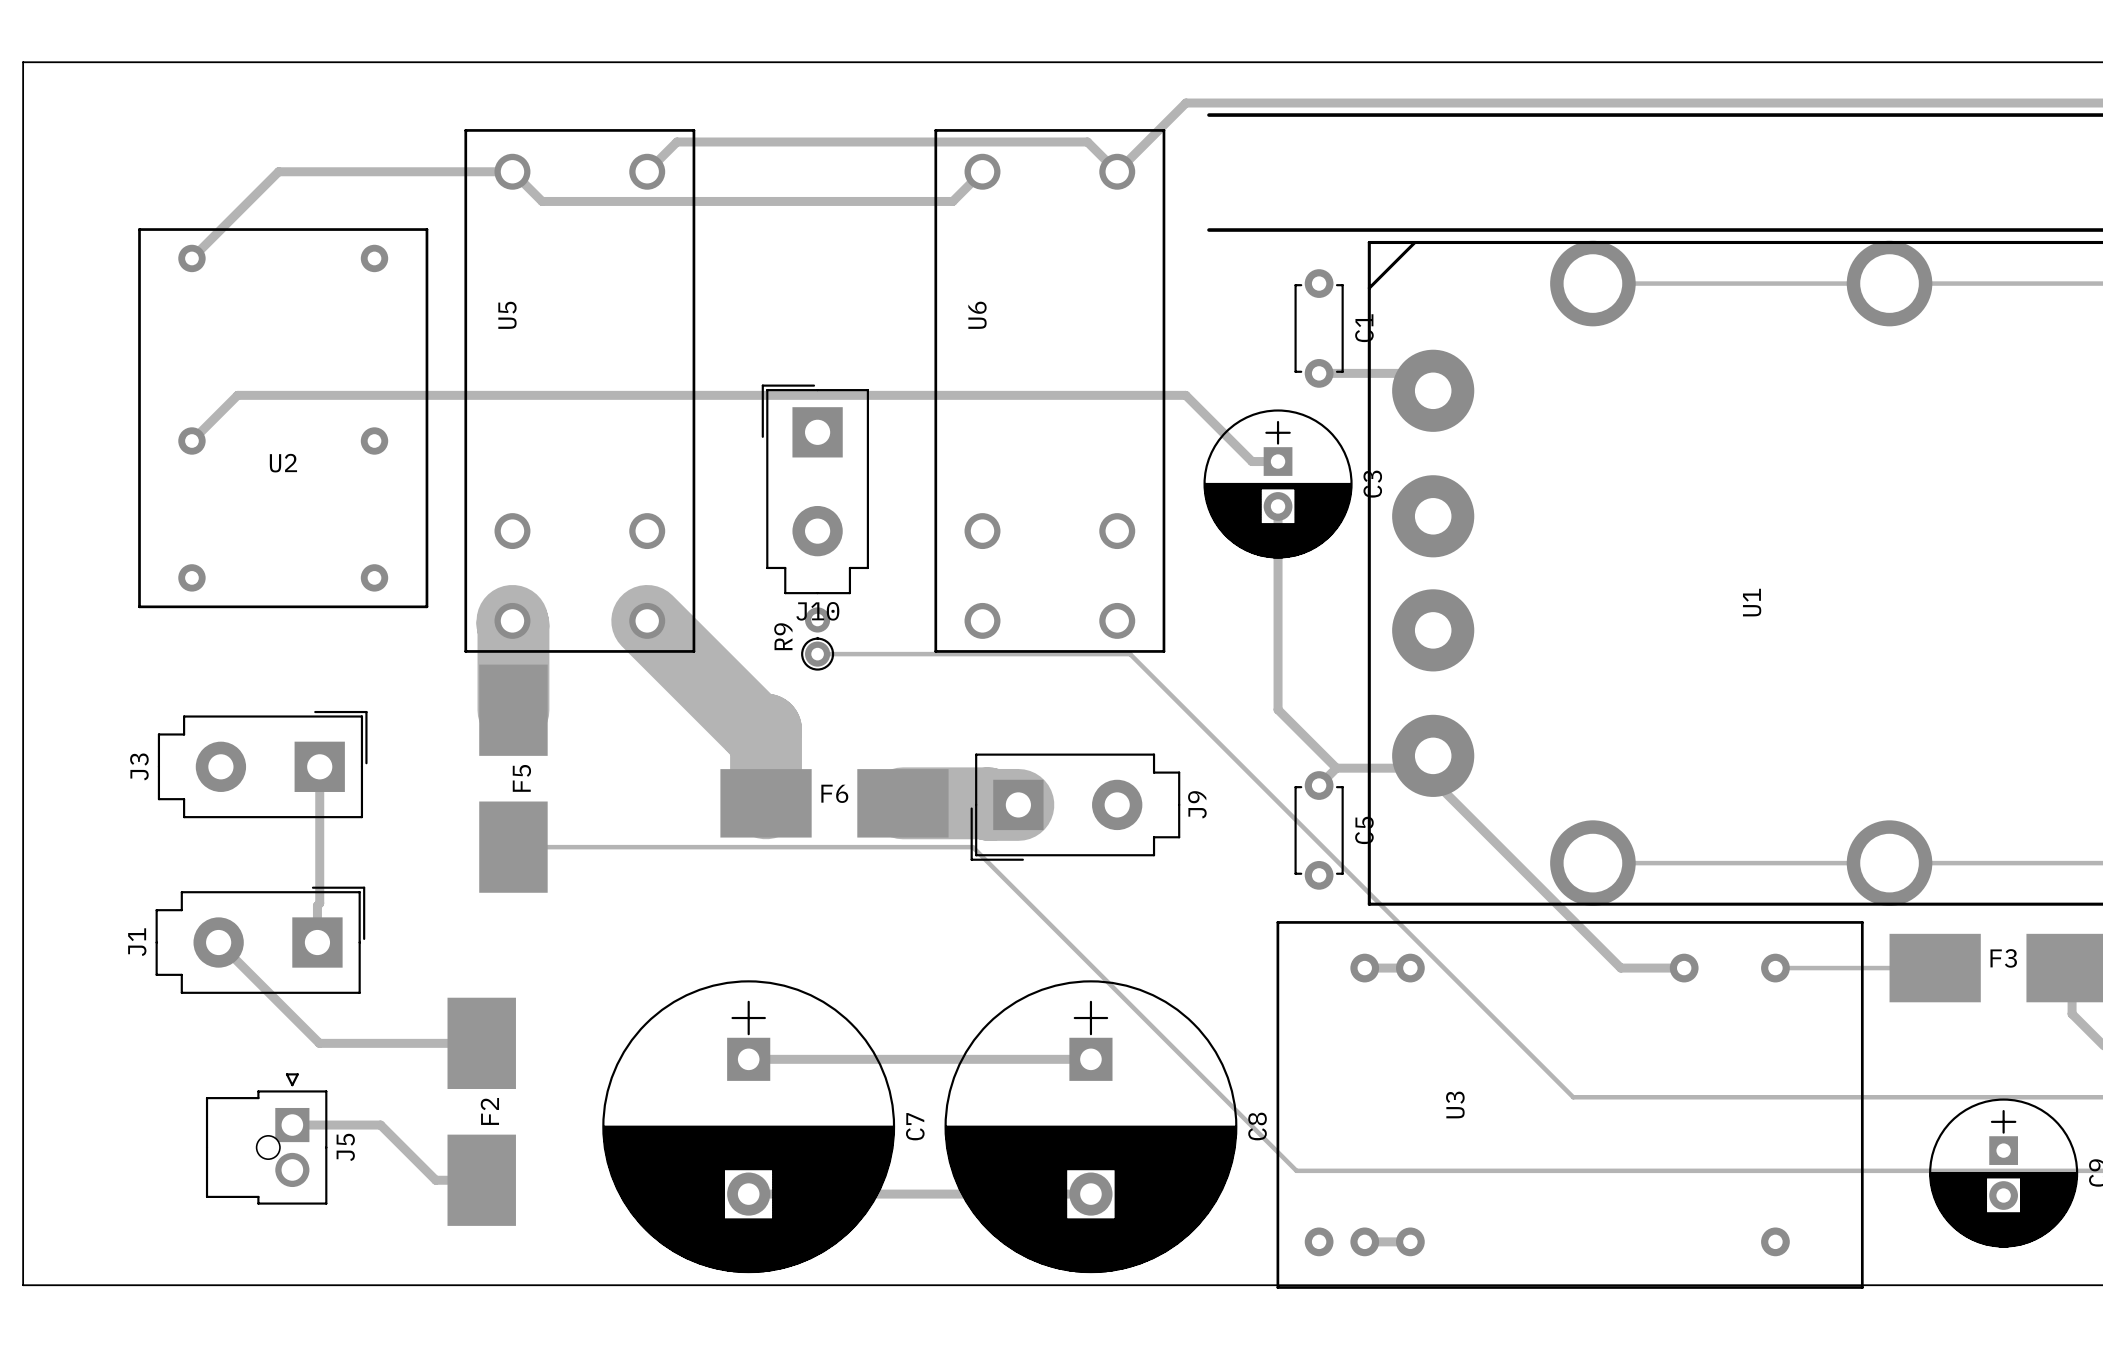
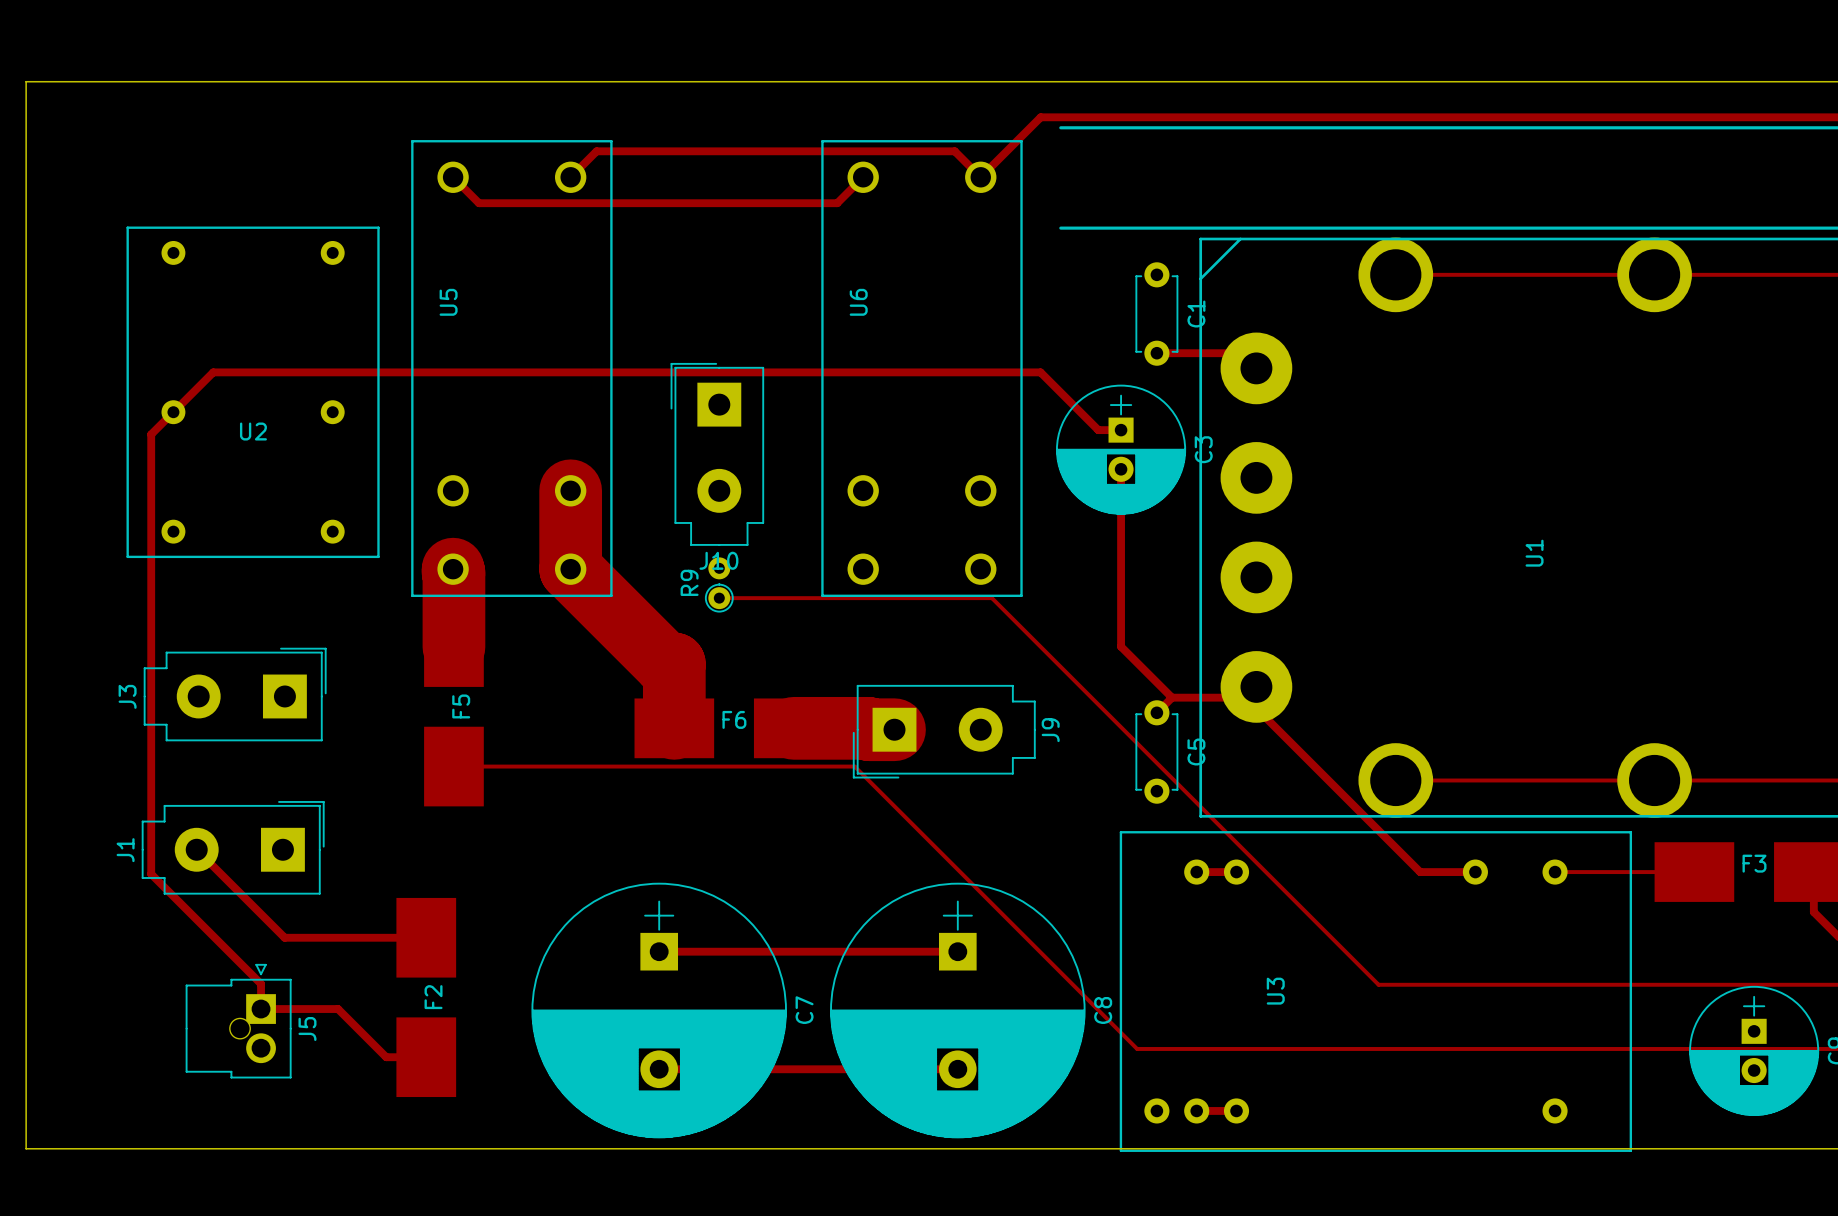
track: (512, 171) (278, 171) (191, 258) -> none
track: none -> (173, 412) (151, 434) (151, 874) (261, 983) (261, 1009)
track: none -> (570, 490) (570, 569)
track: (319, 766) (319, 903) (317, 905) (317, 942) -> none

